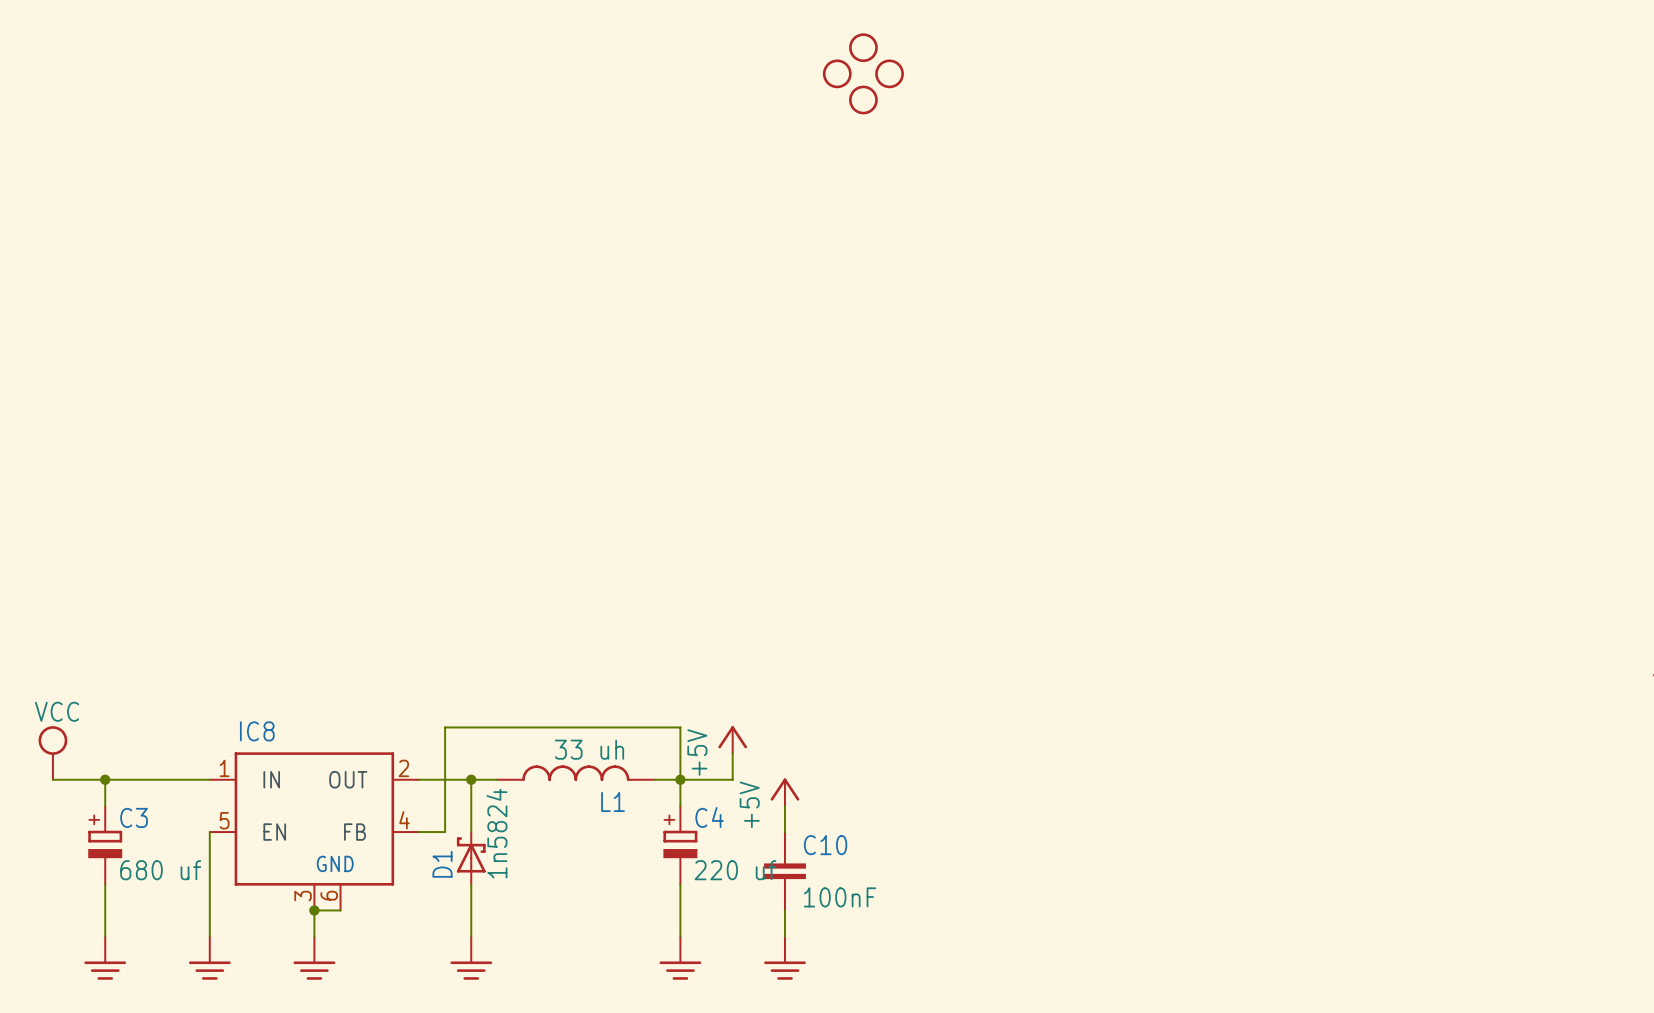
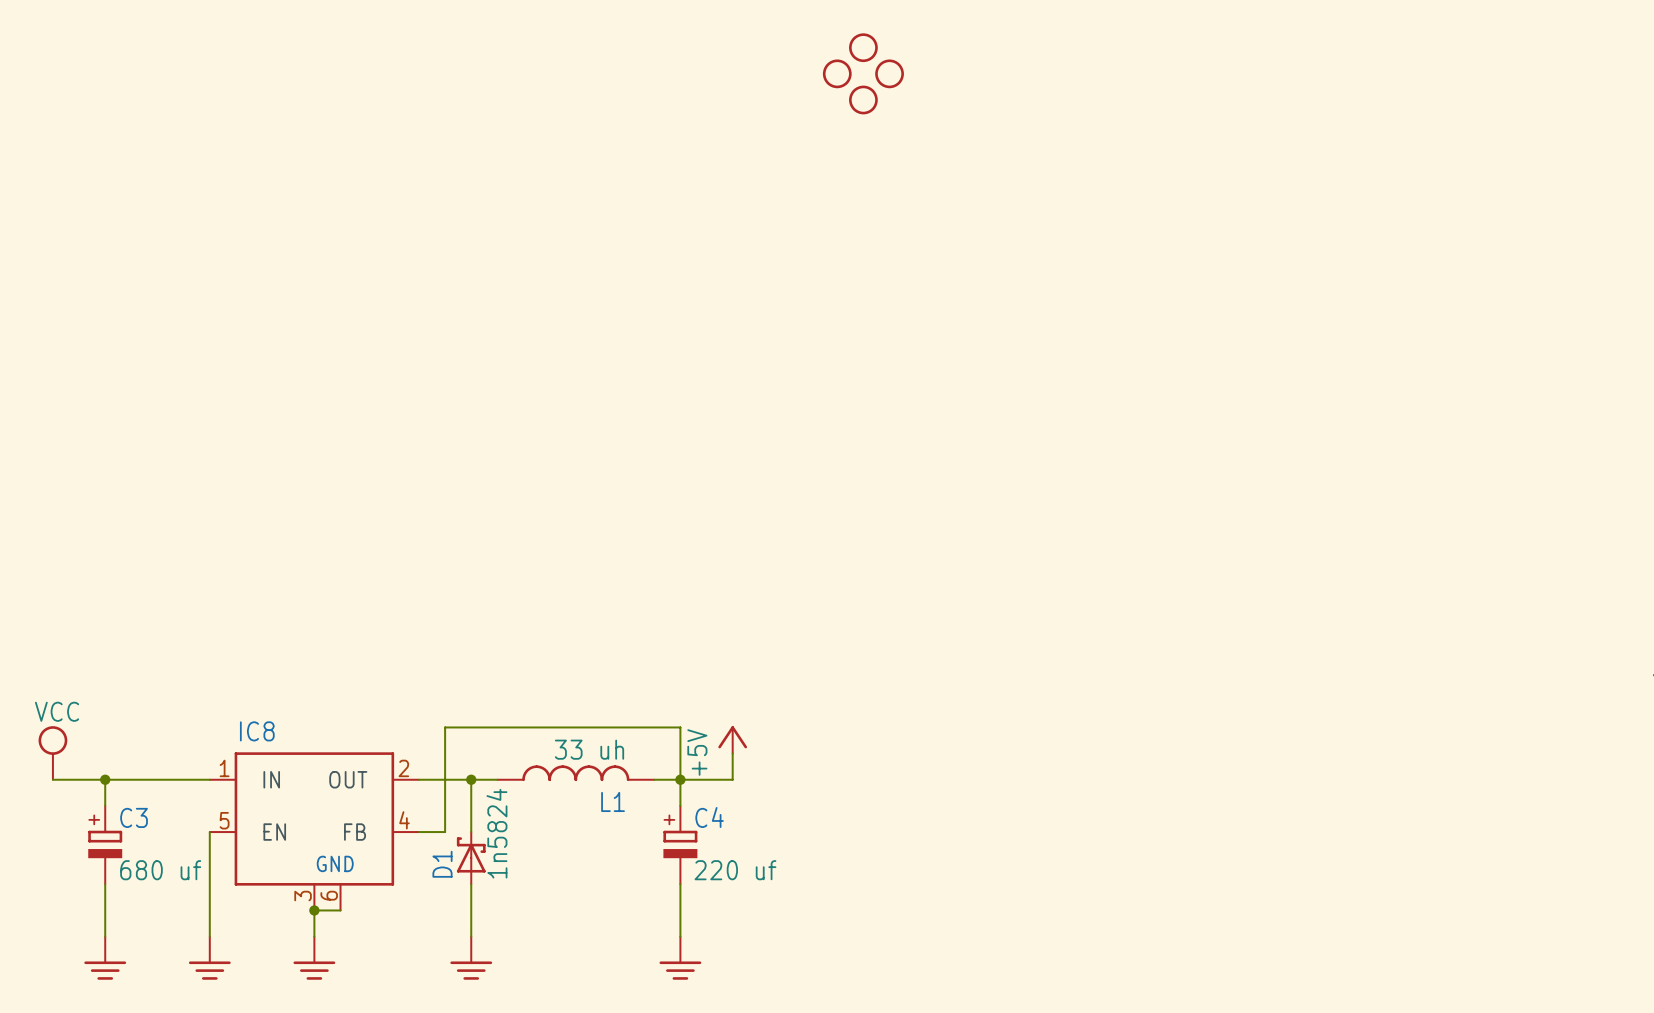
power symbol: +5V (784, 792) -> none
wire: (784, 805) (784, 832) -> none
C10: 100nF (784, 871) -> none
wire: (784, 910) (784, 936) -> none
power symbol: (784, 958) -> none

